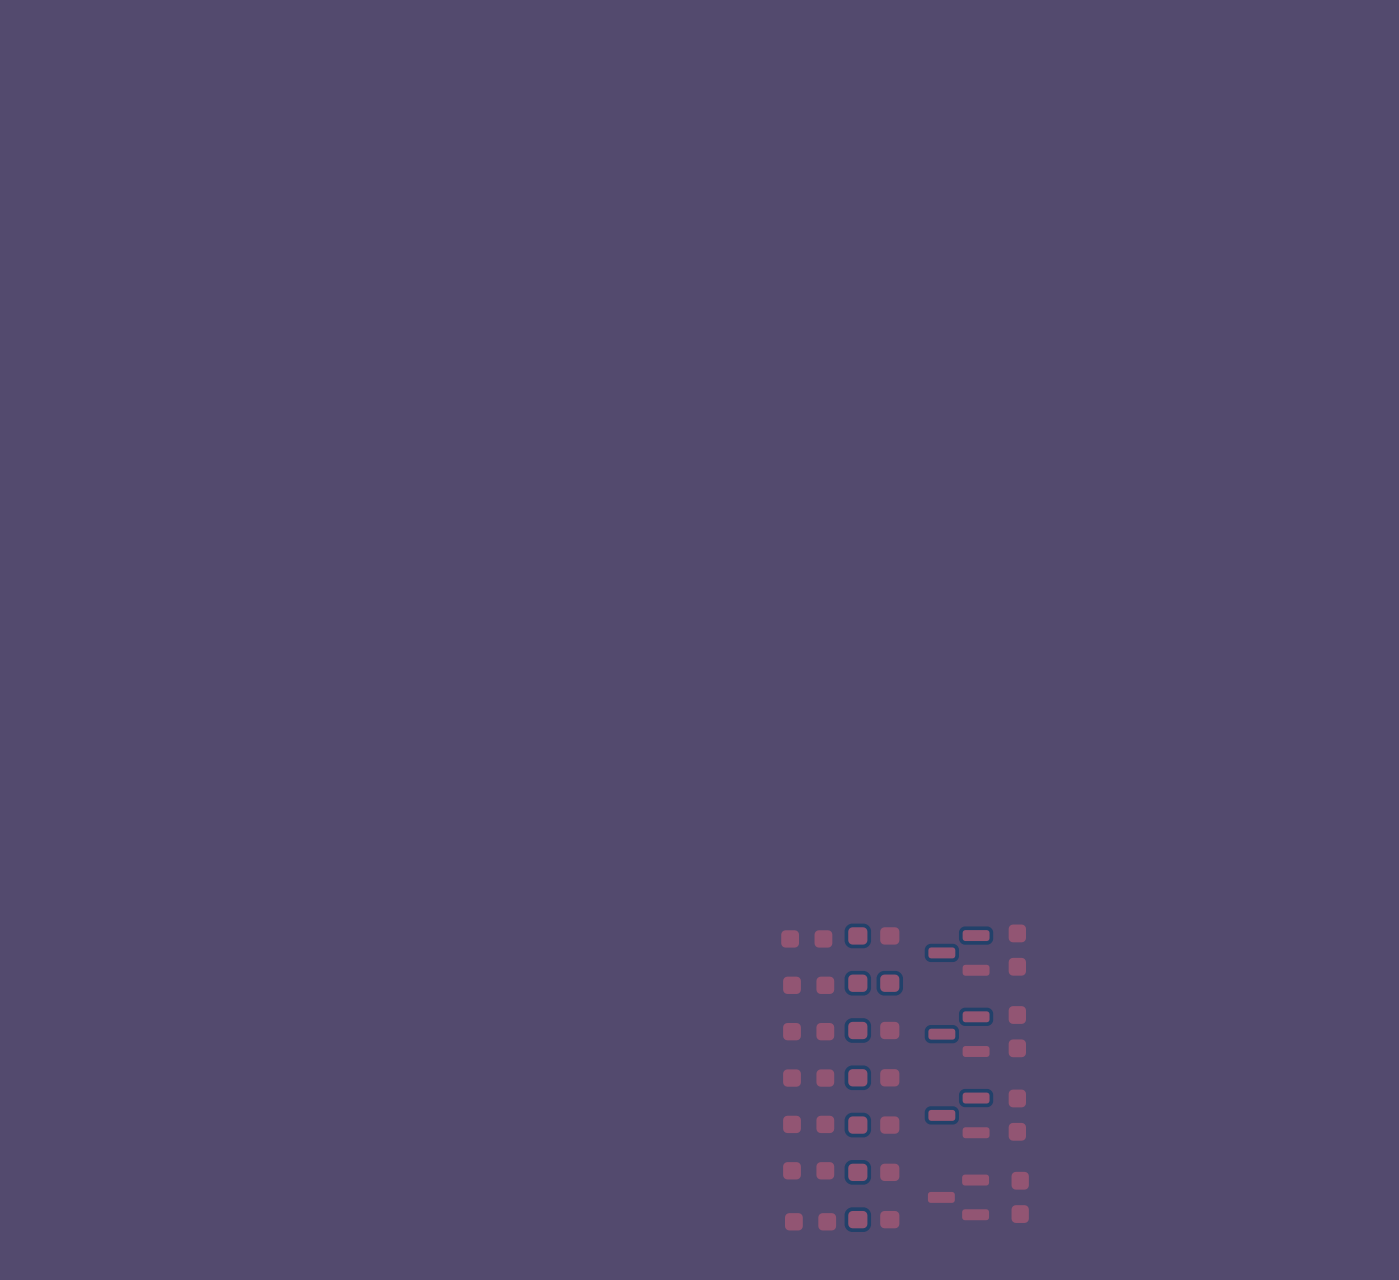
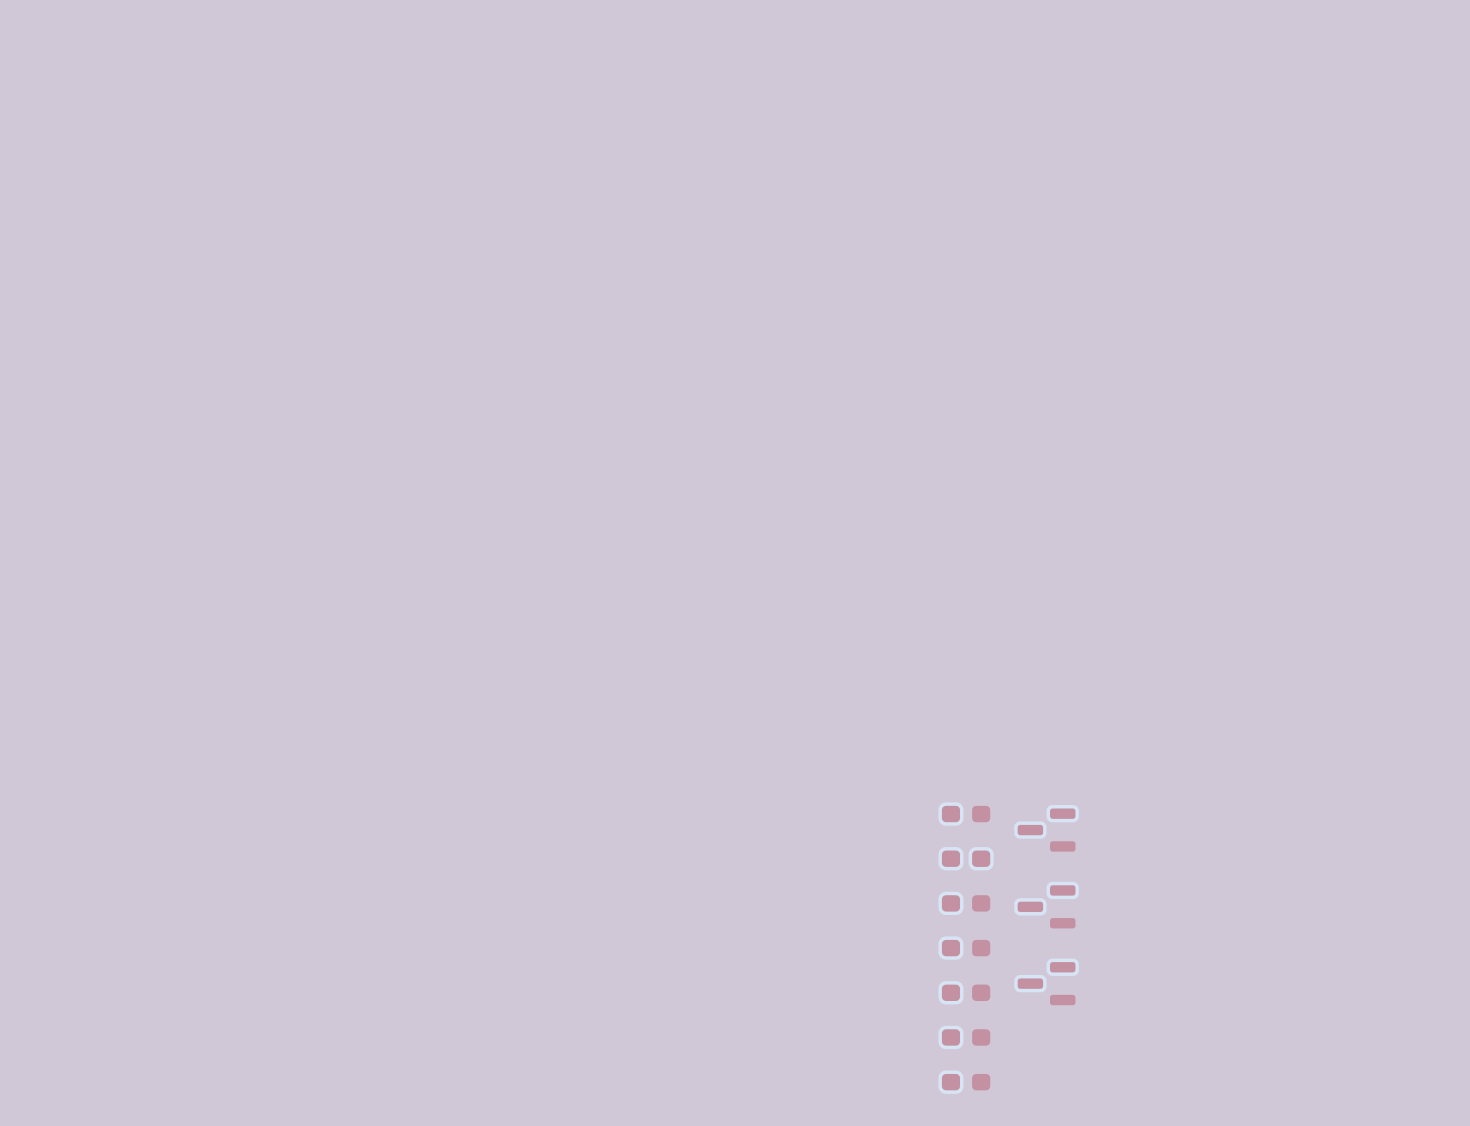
part: (806, 938) -> none
part: (1017, 950) -> none
part: (808, 985) -> none
part: (808, 1031) -> none
part: (1017, 1031) -> none
part: (808, 1078) -> none
part: (1017, 1115) -> none
part: (808, 1124) -> none
part: (808, 1170) -> none
part: (958, 1197) -> none
part: (1020, 1197) -> none
part: (810, 1221) -> none

